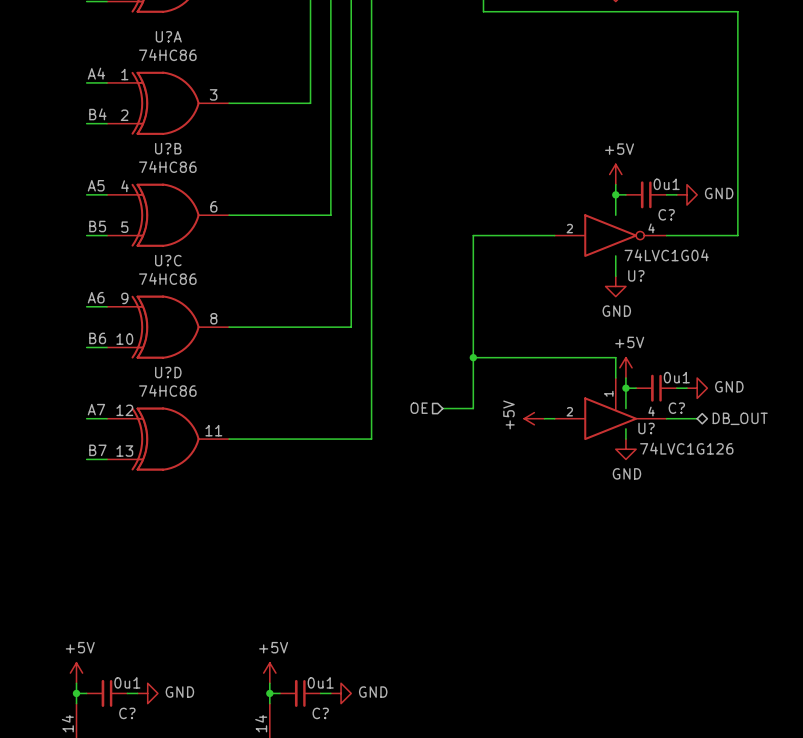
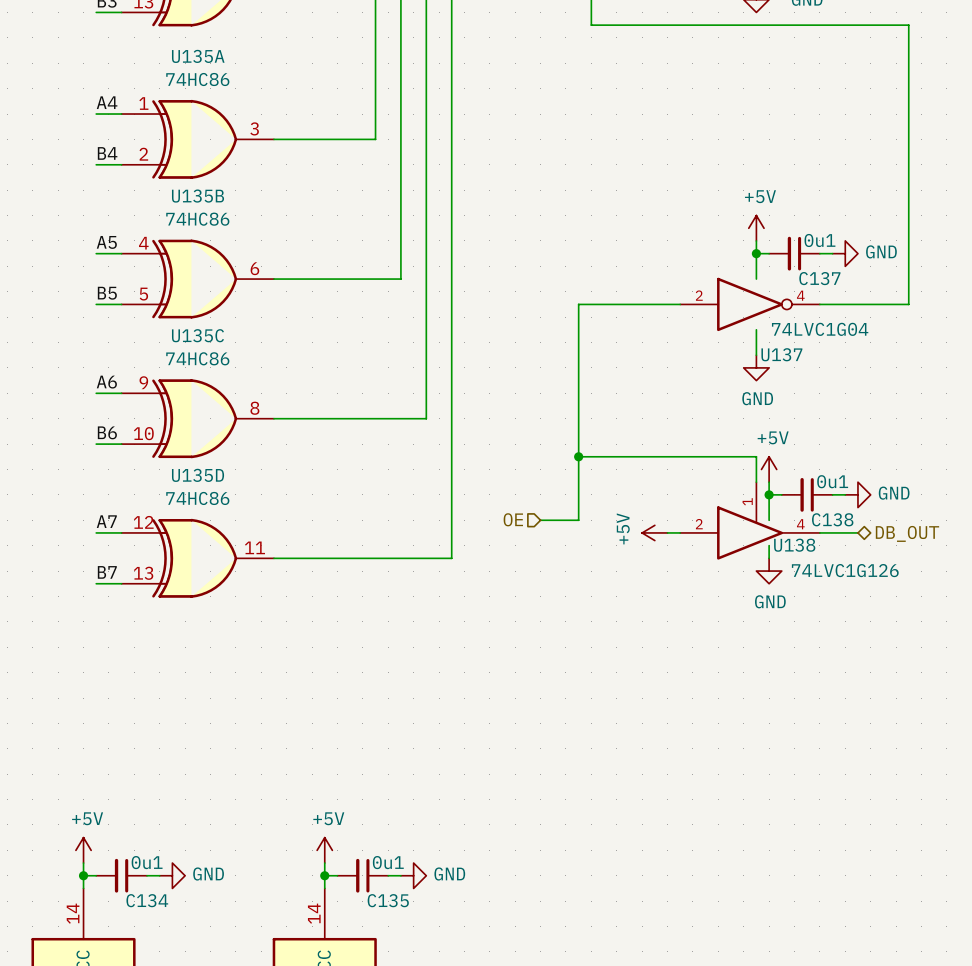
U?A name: U?A (168, 36) -> U135A (198, 56)
U?B name: U?B (168, 148) -> U135B (198, 196)
C? name: C? (666, 214) -> C137 (819, 278)
U?C name: U?C (168, 260) -> U135C (197, 335)
U? name: U? (636, 275) -> U137 (781, 354)
U?D name: U?D (168, 372) -> U135D (198, 475)
C? name: C? (676, 408) -> C138 (832, 519)
U? name: U? (646, 428) -> U138 (794, 545)
C? name: C? (127, 713) -> C134 (147, 900)
C? name: C? (320, 713) -> C135 (388, 900)

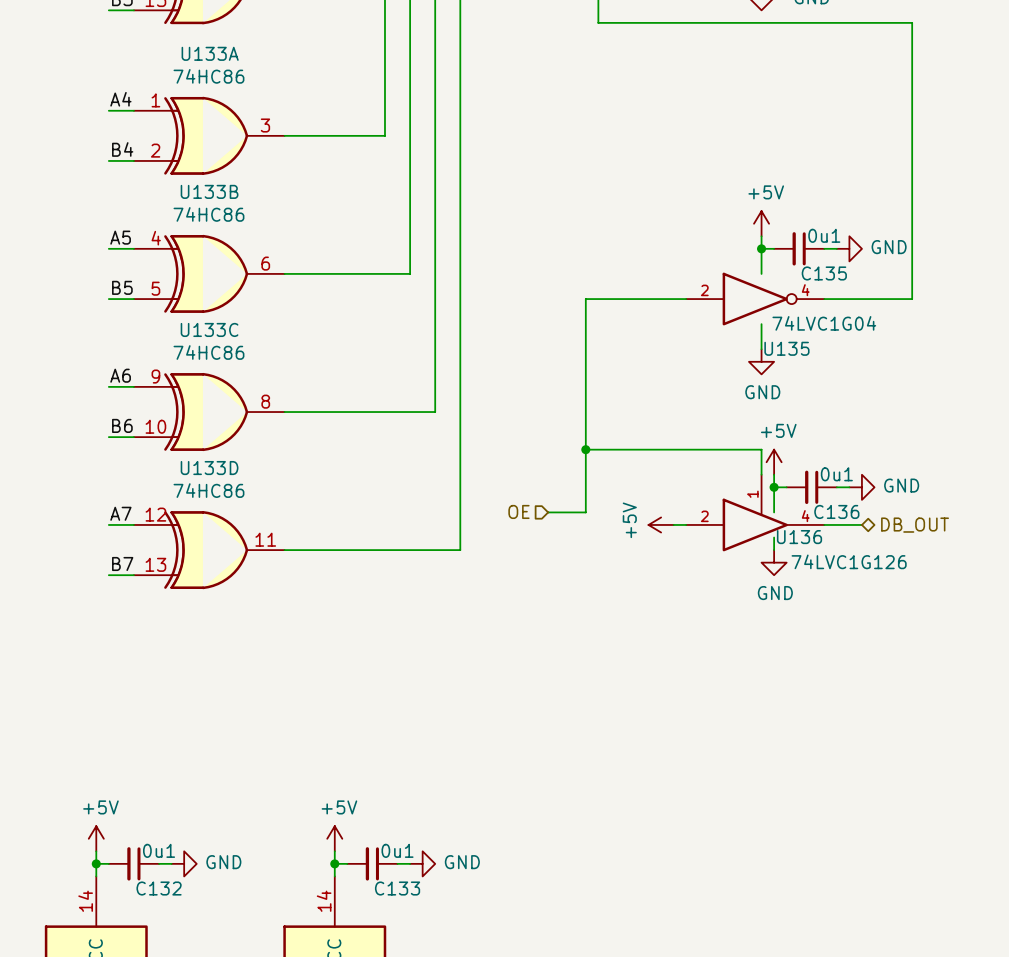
U135A name: U135A (198, 56) -> U133A (210, 53)
U135B name: U135B (198, 196) -> U133B (209, 191)
C137 name: C137 (819, 278) -> C135 (824, 273)
U135C name: U135C (197, 335) -> U133C (209, 329)
U137 name: U137 (781, 354) -> U135 (786, 348)
U135D name: U135D (198, 475) -> U133D (209, 468)
C138 name: C138 (832, 519) -> C136 (836, 511)
U138 name: U138 (794, 545) -> U136 (799, 537)
C134 name: C134 (147, 900) -> C132 (159, 888)
C135 name: C135 (388, 900) -> C133 (397, 888)

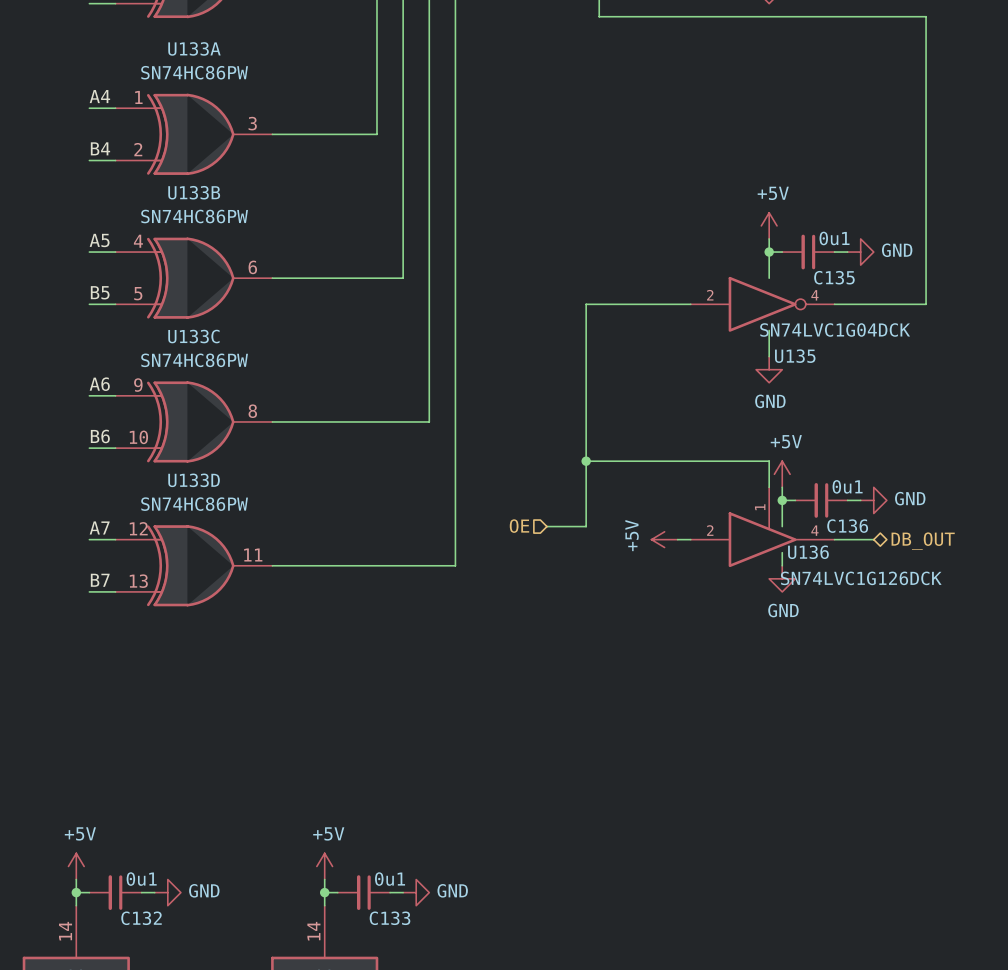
U133A value: 74HC86 (208, 76) -> SN74HC86PW (194, 72)
U133B value: 74HC86 (208, 214) -> SN74HC86PW (194, 216)
U135 value: 74LVC1G04 (824, 323) -> SN74LVC1G04DCK (835, 329)
U133C value: 74HC86 (208, 352) -> SN74HC86PW (194, 360)
U133D value: 74HC86 (208, 490) -> SN74HC86PW (194, 504)
U136 value: 74LVC1G126 (849, 561) -> SN74LVC1G126DCK (861, 578)

